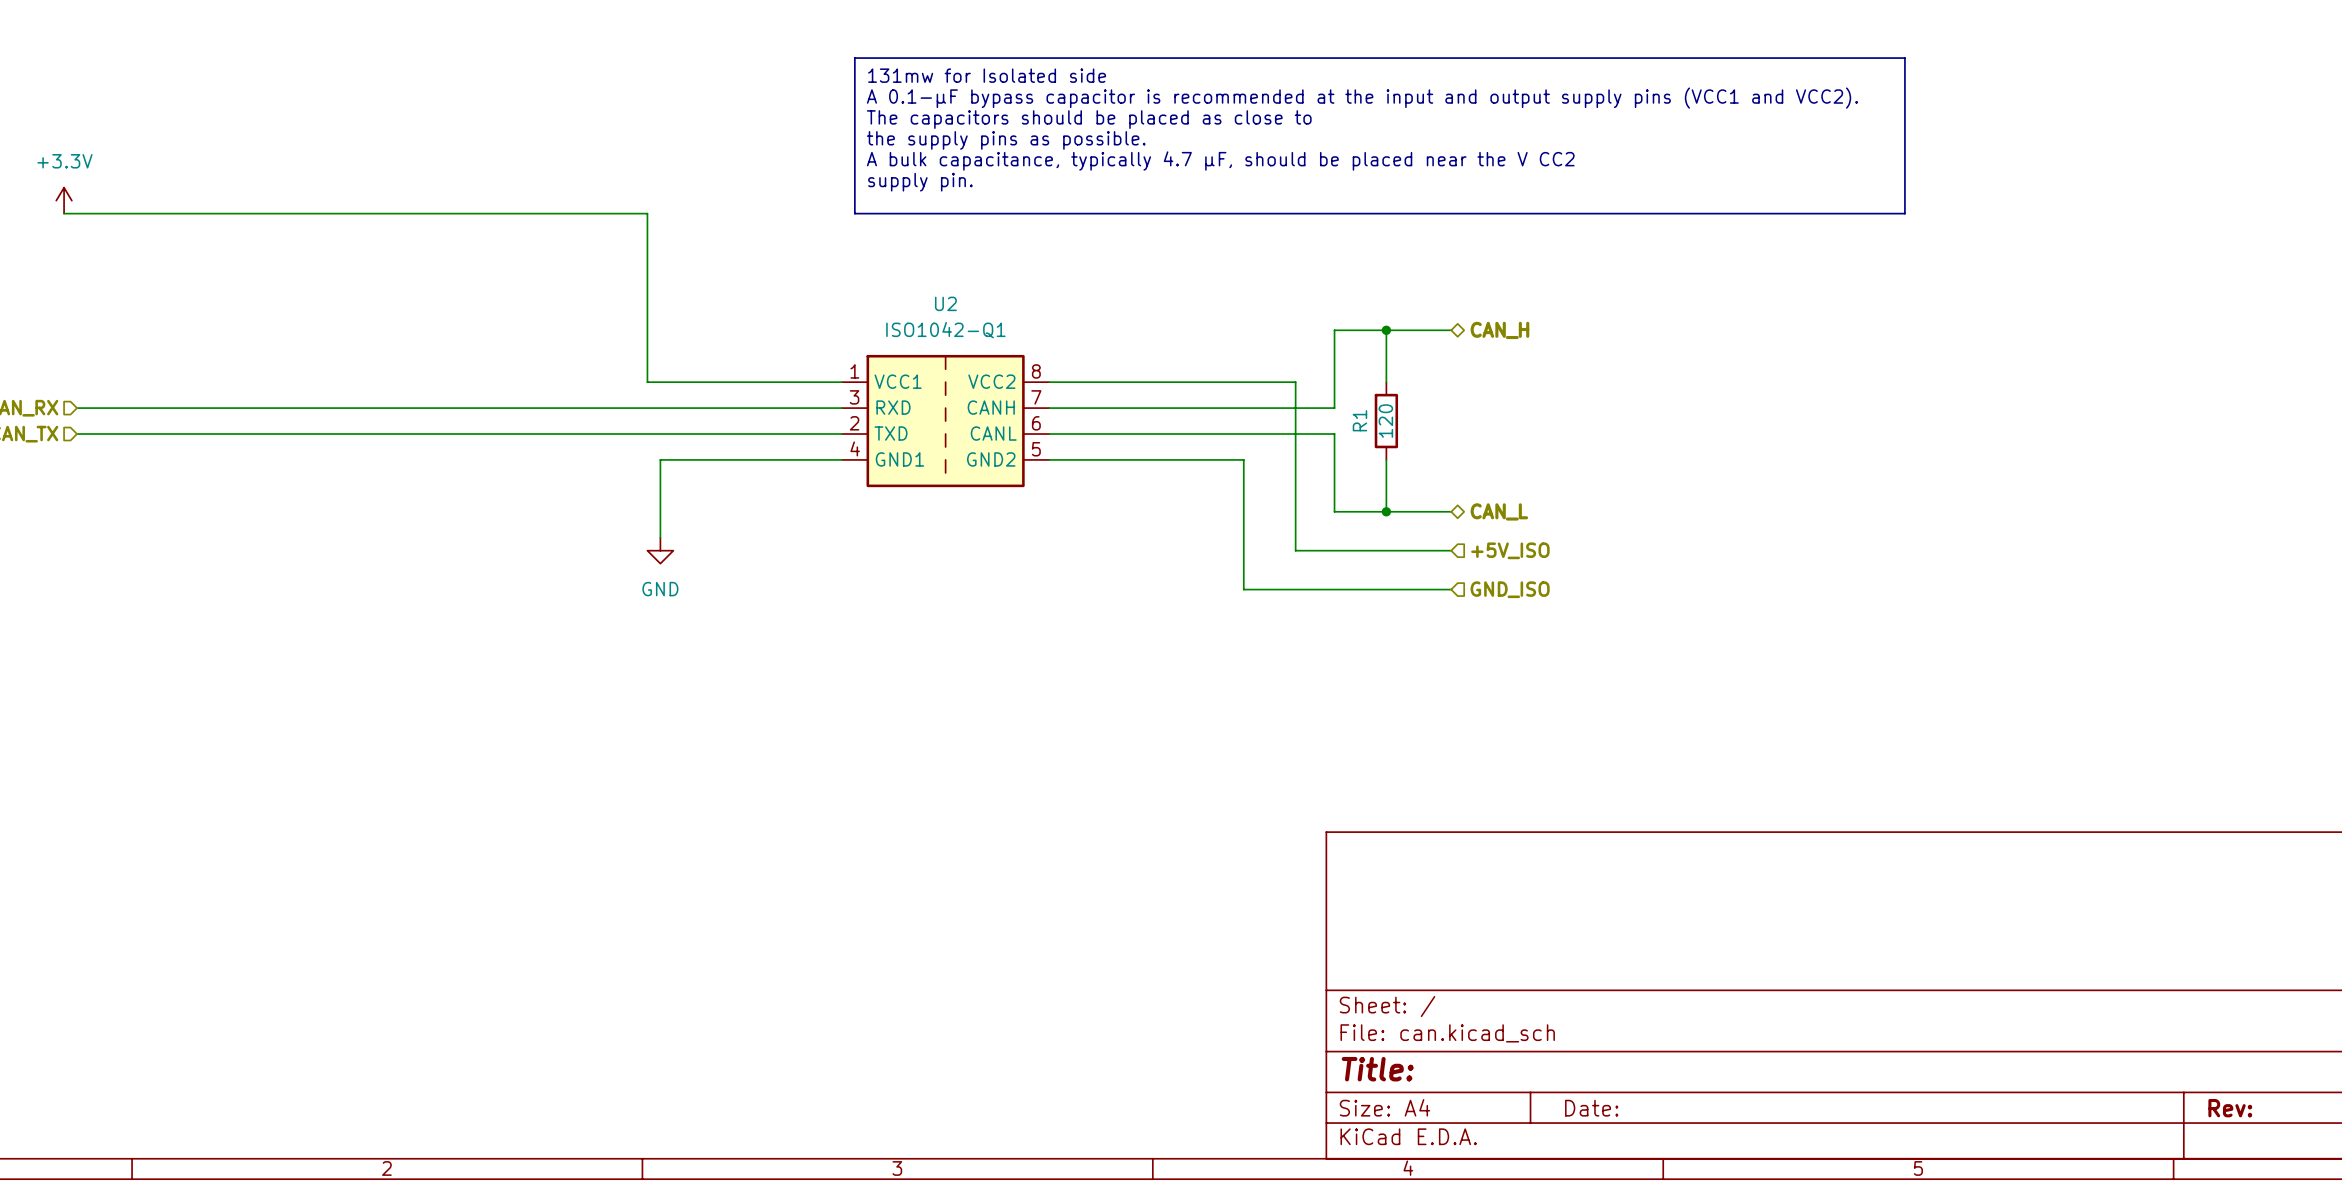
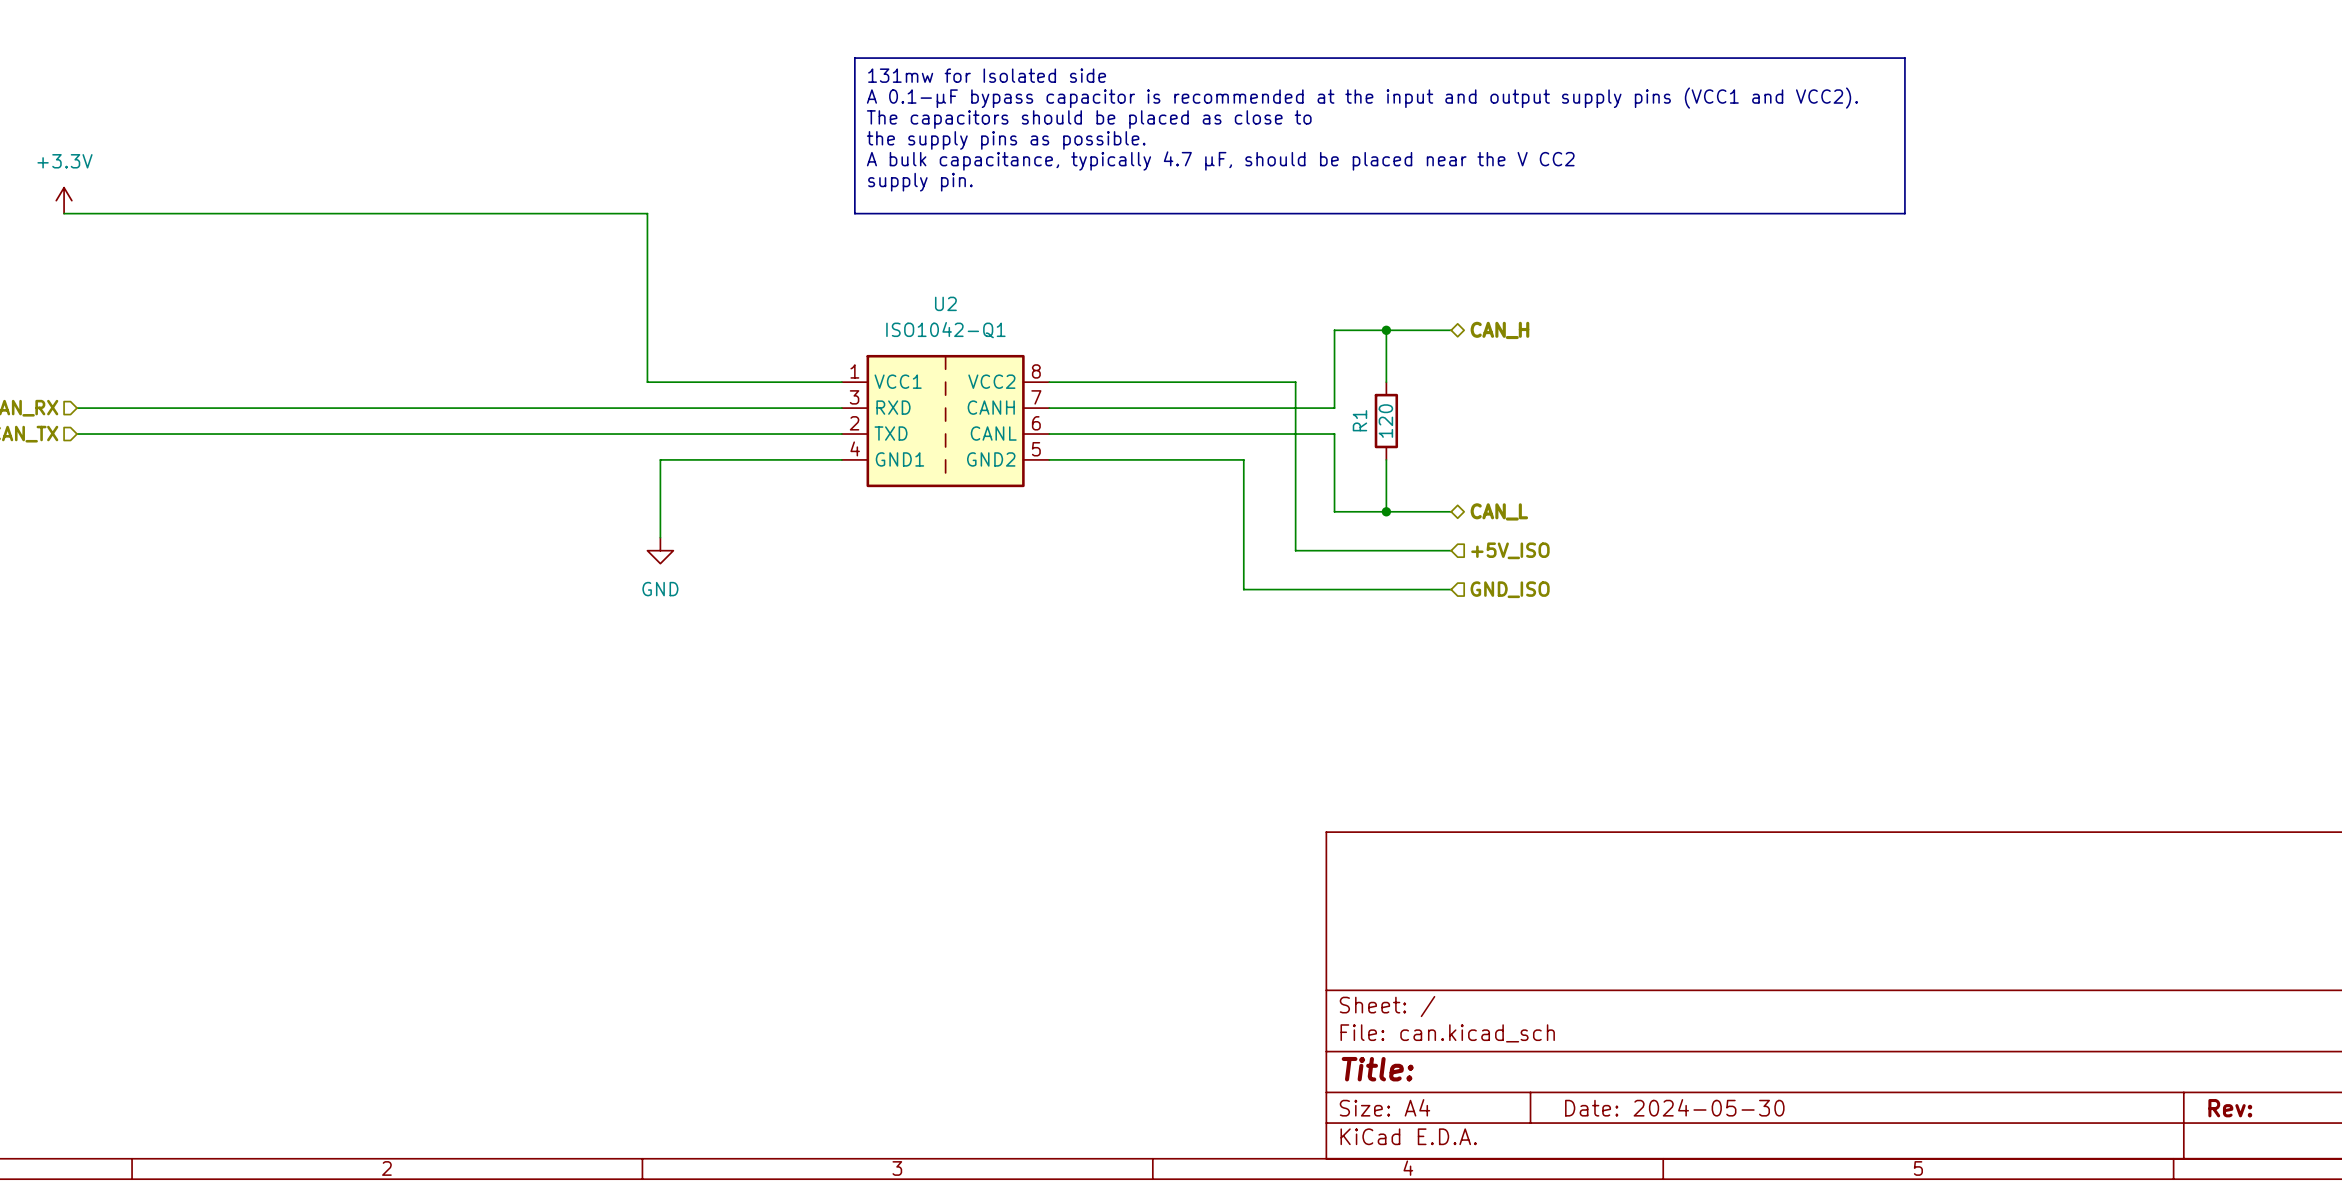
title block: Date: (1591, 1108) -> Date: 2024-05-30 (1674, 1107)

